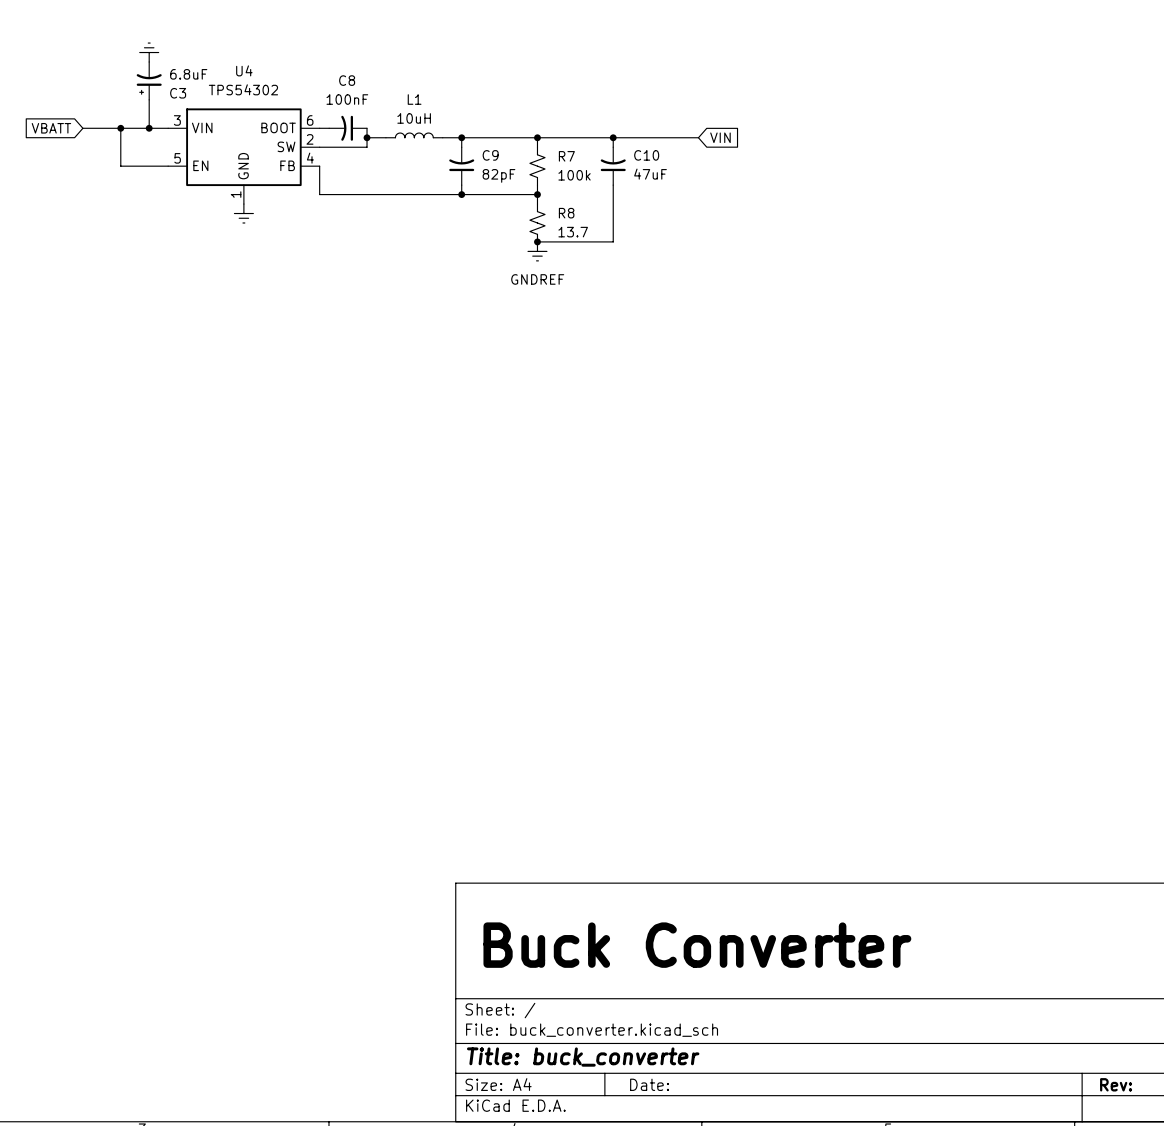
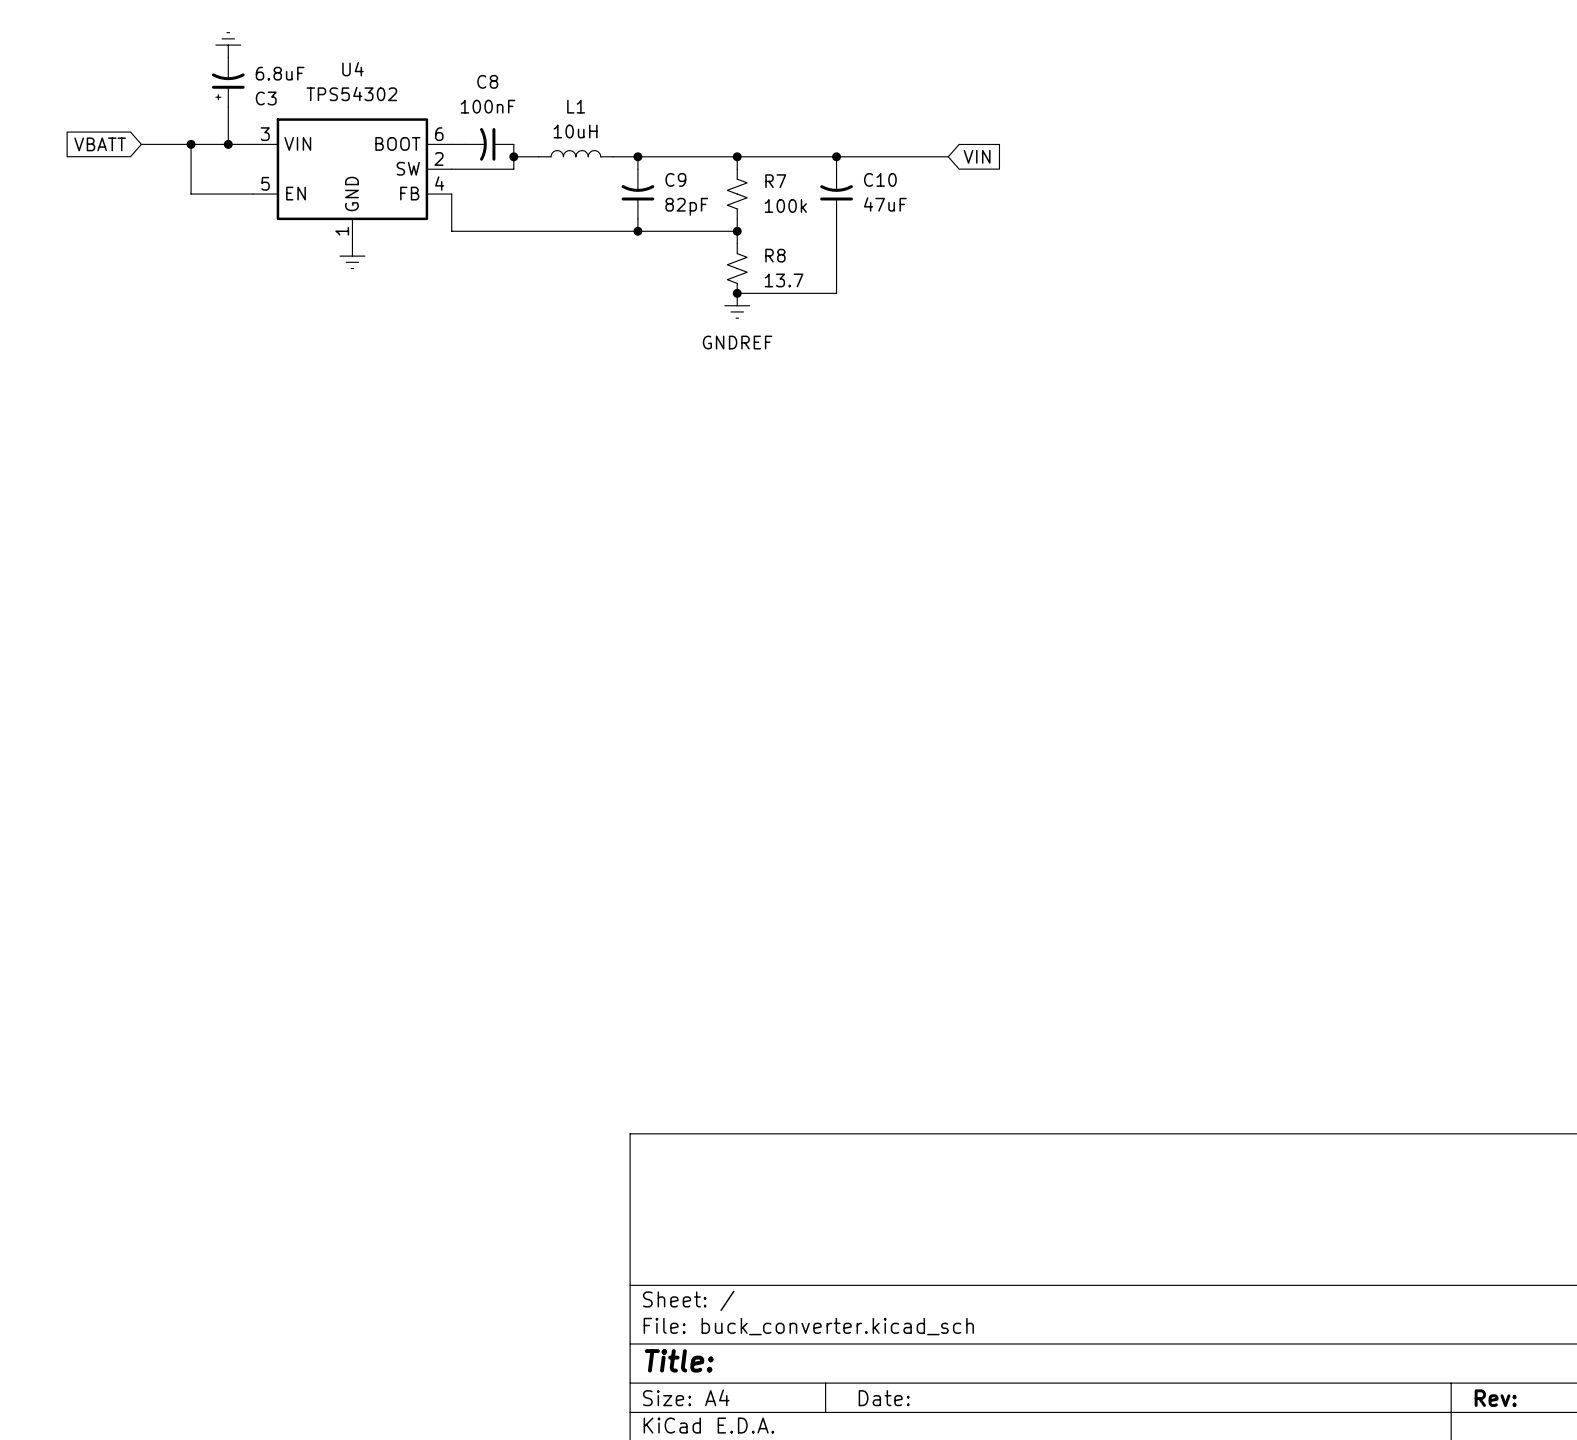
text: Buck Converter (697, 945) -> none
title block: Title: buck_converter (583, 1057) -> Title: (679, 1360)

